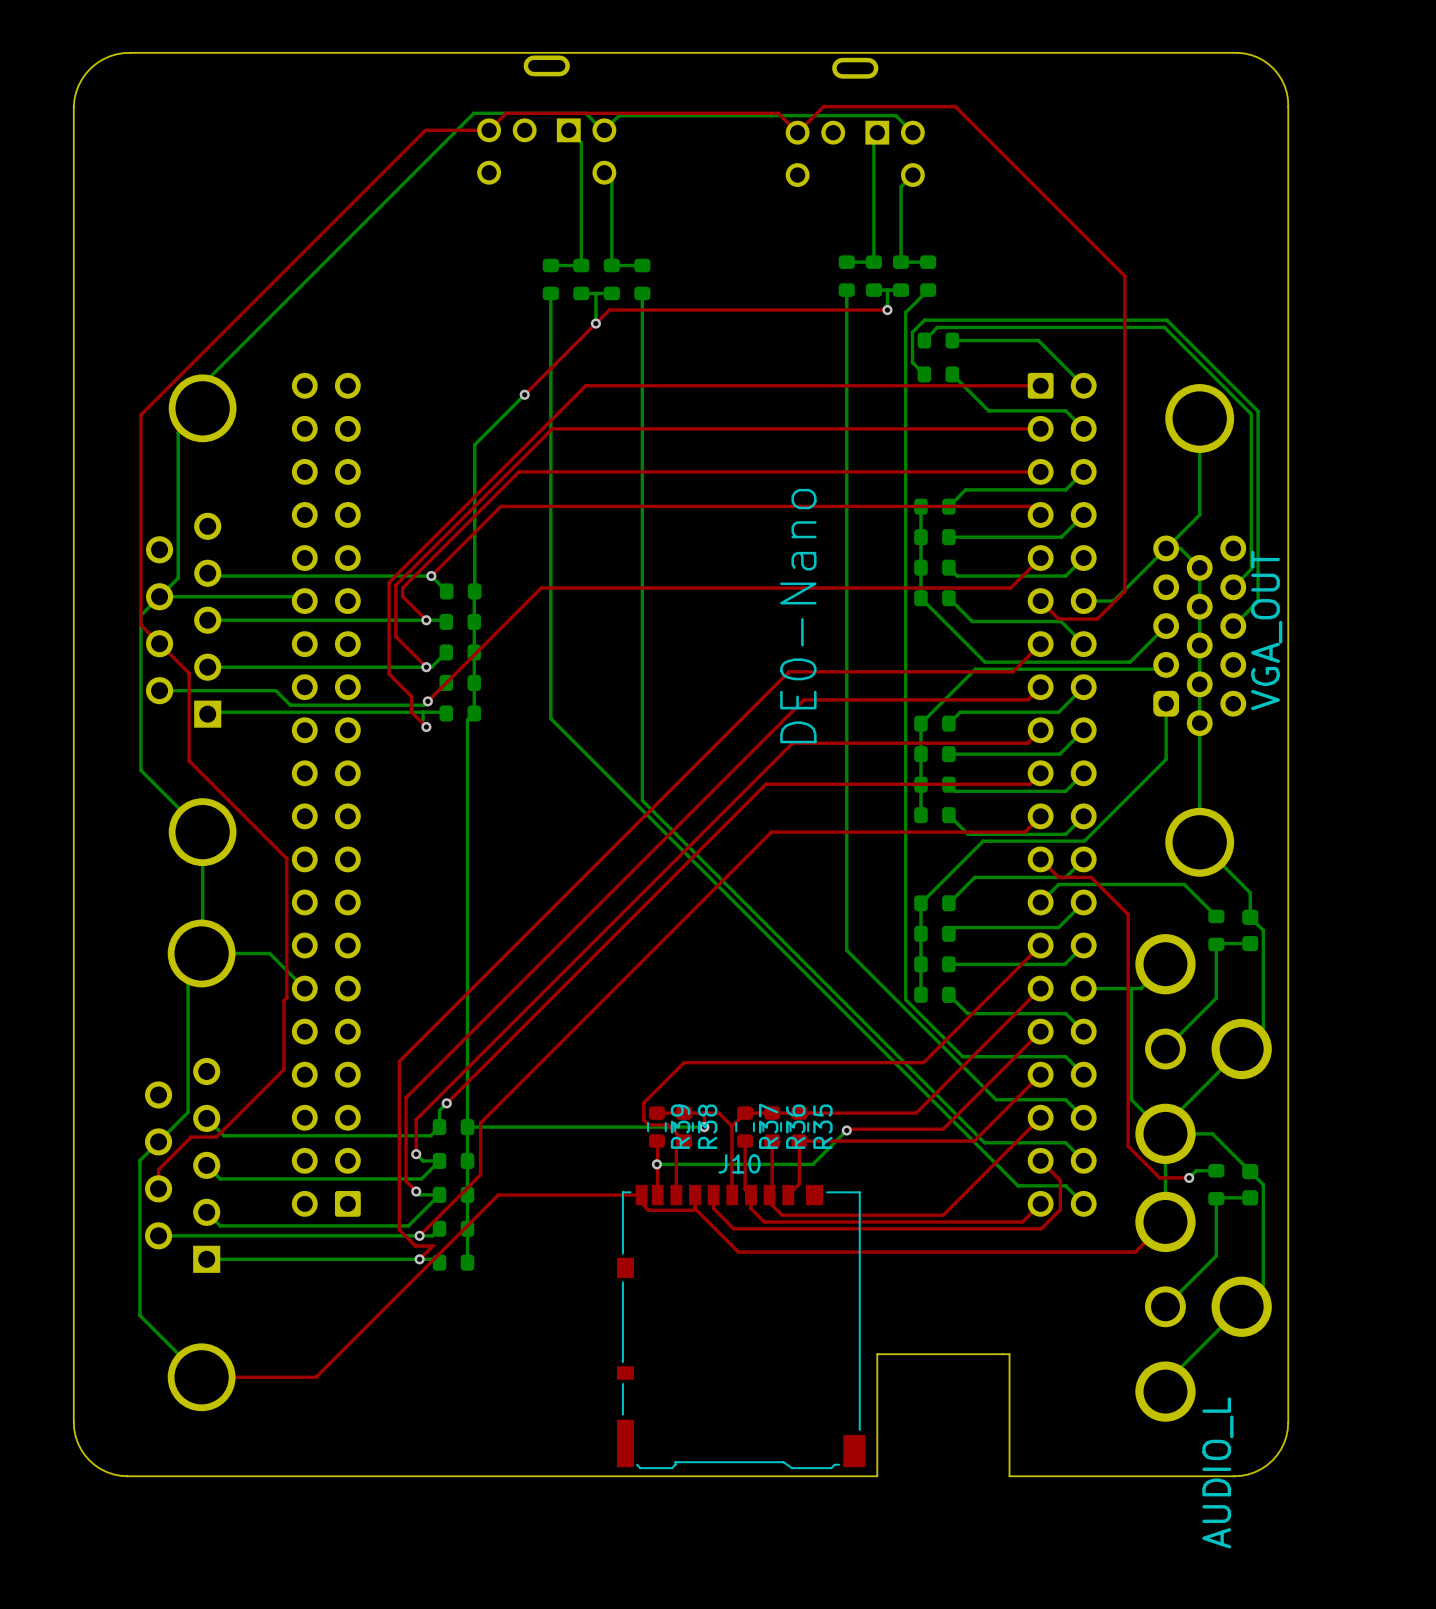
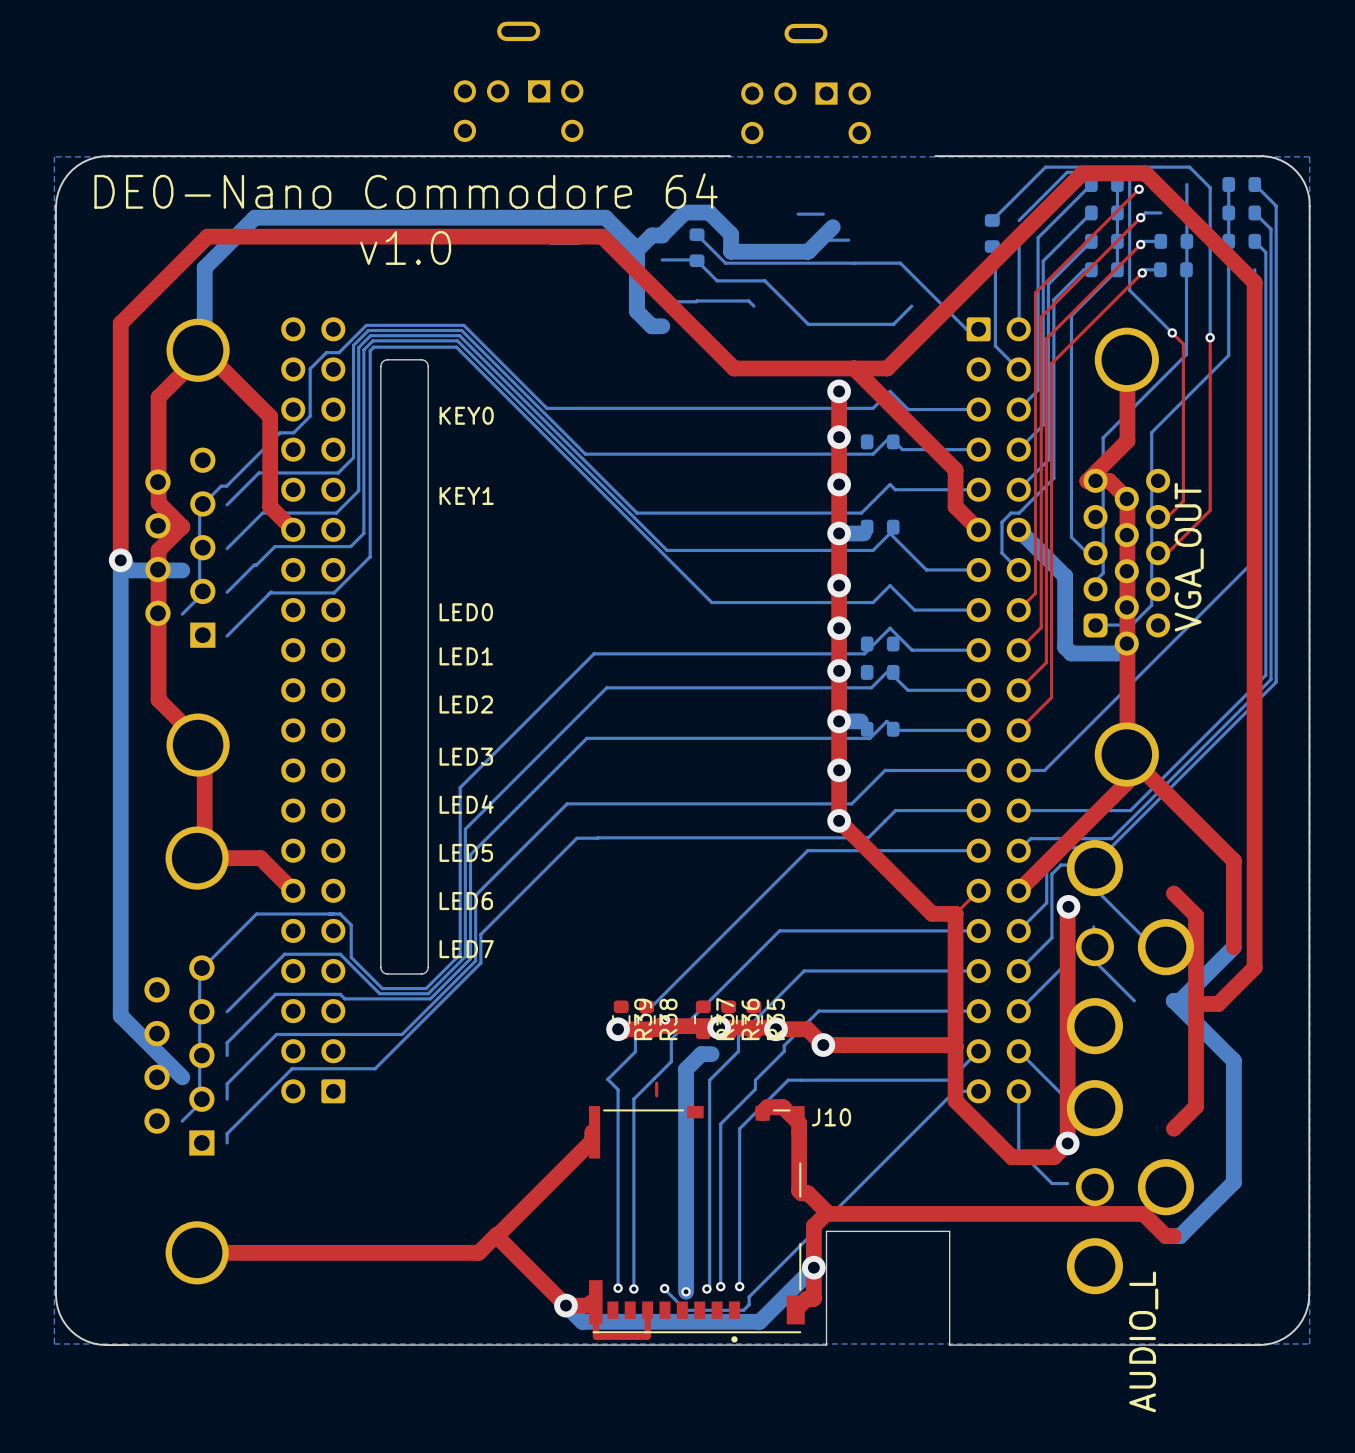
bottom track: (568, 130) (581, 142) (581, 265) (550, 265) -> none
bottom track: (877, 132) (873, 136) (873, 262) (877, 258) -> none
bottom track: (912, 132) (895, 115) (619, 115) (602, 130) (585, 113) (473, 113) (202, 384) (202, 408) (178, 432) (178, 578) (140, 615) (140, 770) (202, 832) (202, 952) (188, 967) (188, 1112) (139, 1160) (139, 1315) (201, 1377) -> none
bottom track: (604, 172) (611, 180) (611, 265) (642, 265) -> none
bottom track: (912, 175) (901, 186) (901, 262) (928, 262) -> none
board edge: none -> (935, 156) (1269, 156) (1286, 163) (1296, 171) (1303, 181) (1308, 193) (1308, 1301) (1305, 1314) (1294, 1330) (1284, 1338) (1272, 1343) (1259, 1345) (1159, 1345)
bottom zone outline: none -> (54, 156) (54, 1343) (1309, 1343) (1309, 156) (54, 156)
part: none -> (1104, 184)
bottom track: none -> (1117, 184) (1117, 269) (1071, 315) (1071, 537) (1087, 553)
bottom track: none -> (1186, 184) (1186, 354) (1103, 437) (1103, 573) (1087, 589)
bottom track: none -> (1228, 184) (1228, 355) (1151, 432) (1151, 605) (1131, 625) (1087, 625)
part: none -> (1241, 184)
top track: none -> (1139, 189) (1035, 292) (1035, 593) (1018, 610)
via: none -> (1139, 189)
text: none -> DE0-Nano Commodore 64 (406, 191)
part: none -> (1104, 212)
bottom track: none -> (1160, 212) (1145, 212) (1140, 217)
part: none -> (1241, 212)
top track: none -> (1140, 217) (1041, 317) (1041, 627) (1018, 650)
via: none -> (1140, 217)
bottom track: none -> (992, 220) (1045, 167) (1189, 167) (1210, 187) (1210, 337)
bottom track: none -> (1019, 220) (1067, 172) (1123, 172) (1129, 178) (1129, 290) (1172, 332)
part: (846, 276) -> none
part: (873, 276) -> none
bottom track: none -> (832, 227) (808, 251) (731, 251) (731, 234) (709, 212) (684, 212) (662, 235) (651, 235) (637, 250)
part: (901, 276) -> none
part: (928, 276) -> none
part: (550, 279) -> none
part: (581, 279) -> none
part: (611, 279) -> none
part: (642, 279) -> none
part: none -> (992, 233)
bottom track: none -> (697, 234) (725, 263) (900, 263) (966, 329) (978, 329)
bottom track: (846, 290) (846, 950) (996, 1099) (1065, 1099) (1083, 1117) -> (1067, 950) (1067, 962) (1018, 1011)
bottom track: (887, 290) (887, 310) -> none
bottom track: (928, 290) (905, 312) (905, 999) (962, 1056) (1065, 1056) (1083, 1074) -> (1067, 865) (1060, 865) (1051, 874) (1051, 937) (1018, 971)
part: none -> (1104, 241)
bottom track: none -> (1160, 241) (1143, 241) (1140, 244)
part: none -> (1173, 241)
part: none -> (1241, 241)
bottom track: (550, 293) (550, 718) (1018, 1185) (1065, 1185) (1083, 1203) -> (1067, 1183) (1052, 1183) (1018, 1150) (1018, 1091)
bottom track: (595, 293) (595, 323) -> none
bottom track: (642, 293) (642, 800) (984, 1142) (1065, 1142) (1083, 1160) -> (1067, 1103) (1067, 1100) (1018, 1051)
top track: none -> (1140, 244) (1046, 338) (1046, 662) (1018, 690)
via: none -> (1140, 244)
text: none -> v1.0 (405, 247)
part: none -> (697, 247)
top track: (887, 310) (609, 310) (524, 394) -> none
via: (887, 310) -> none
bottom track: none -> (662, 259) (696, 259) (717, 280) (764, 280) (808, 324) (893, 324) (911, 306)
part: none -> (1104, 269)
bottom track: none -> (1160, 269) (1145, 269) (1142, 272)
part: none -> (1173, 269)
via: (595, 323) -> none
top track: none -> (1142, 272) (1051, 363) (1051, 697) (1018, 730)
via: none -> (1142, 272)
bottom track: (924, 340) (937, 327) (1164, 327) (1251, 414) (1251, 569) (1233, 587) -> none
part: (938, 340) -> none
bottom track: (952, 340) (1038, 340) (1083, 385) -> (1019, 246) (1018, 329)
bottom track: none -> (662, 301) (748, 300) (753, 306)
bottom track: (924, 374) (912, 362) (912, 332) (924, 320) (1166, 320) (1258, 411) (1258, 601) (1233, 626) -> none
part: (938, 374) -> none
bottom track: (952, 374) (988, 410) (1065, 410) -> (992, 246) (995, 249) (995, 346) (1001, 352)
bottom track: none -> (662, 326) (651, 326) (637, 311) (637, 249) (605, 217) (254, 217) (204, 267) (204, 351)
top track: (1040, 385) (585, 385) (389, 582) (389, 674) (411, 696) (411, 712) (426, 727) -> none
top track: none -> (1172, 332) (1183, 344) (1183, 501) (1167, 517)
via: none -> (1172, 332)
bottom track: (524, 394) (474, 444) (474, 713) (467, 720) (467, 1262) -> none
via: (524, 394) -> none
top track: none -> (1210, 337) (1210, 510) (1167, 553)
via: none -> (1210, 337)
board edge: none -> (387, 359) (422, 359) (426, 361) (428, 366) (428, 967) (426, 972) (421, 974) (386, 973) (382, 971) (380, 967) (380, 366) (382, 361) (387, 359)
bottom track: (1199, 418) (1199, 514) (1113, 601) (1083, 601) -> (1127, 643) (1117, 653) (1071, 653) (1065, 647) (1065, 576) (1018, 529)
top track: none -> (1127, 359) (1127, 440) (1087, 481) (1109, 481) (1127, 499) (1127, 782) (1018, 890)
top track: (1040, 428) (552, 428) (395, 585) (395, 636) (426, 667) -> none
top track: none -> (839, 391) (839, 820) (932, 913) (955, 913) (955, 1100) (1011, 1157) (1053, 1157) (1067, 1143) (1068, 906)
via: none -> (839, 391)
top track: (1040, 471) (518, 471) (402, 588) (402, 596) (426, 620) -> none
bottom track: none -> (978, 409) (908, 409) (890, 391) (873, 408) (546, 408) (463, 325) (366, 325) (339, 352) (326, 352) (310, 368) (310, 416) (293, 432) (279, 432) (226, 486) (221, 486) (199, 507) (199, 596) (182, 614)
bottom track: (1083, 471) (1065, 489) (965, 489) (948, 506) -> (1018, 409) (1038, 390) (1038, 237) (1091, 184)
text: none -> KEY0 (466, 415)
via: none -> (839, 437)
bottom track: (920, 506) (920, 598) (984, 662) (1130, 662) (1166, 626) -> none
top track: (1040, 514) (1032, 506) (500, 506) (431, 576) -> none
bottom track: none -> (978, 449) (902, 449) (890, 437) (873, 454) (585, 454) (461, 330) (368, 330) (353, 345) (353, 457) (338, 472) (258, 472) (227, 504)
bottom track: (1083, 514) (1061, 537) (948, 537) -> (1018, 449) (1043, 425) (1043, 261) (1091, 212)
part: (934, 537) -> none
bottom track: (1166, 548) (1180, 548) (1199, 567) (1199, 842) (1250, 892) (1250, 917) (1263, 930) (1263, 1027) (1165, 1125) (1165, 1221) -> none
via: none -> (839, 484)
top track: (1040, 558) (1010, 588) (541, 588) (427, 701) -> none
bottom track: none -> (978, 489) (895, 489) (890, 484) (861, 513) (637, 513) (459, 335) (370, 335) (358, 347) (358, 490) (336, 513) (262, 513) (227, 548)
bottom track: (1083, 558) (1065, 576) (957, 576) (948, 567) -> (1018, 489) (1048, 460) (1048, 284) (1091, 241)
text: none -> KEY1 (466, 495)
part: (934, 567) -> none
bottom track: (207, 573) (210, 576) (431, 576) (446, 591) -> none
via: (431, 576) -> none
part: (460, 591) -> none
bottom track: (159, 596) (300, 596) (304, 601) -> none
bottom track: (948, 598) (972, 621) (1061, 621) (1065, 626) -> (1091, 269) (1083, 269) (1053, 299) (1053, 478) (1019, 513) (1011, 513) (1001, 522) (1001, 553)
top track: none -> (293, 529) (270, 506) (270, 416) (204, 351) (158, 397) (158, 503) (182, 526) (158, 550) (158, 699) (204, 745) (204, 858) (260, 858) (293, 890)
top track: (1040, 601) (1058, 619) (1097, 619) (1124, 591) (1124, 276) (955, 106) (823, 106) (797, 132) (778, 113) (506, 113) (489, 130) (425, 130) (140, 414) (140, 625) (189, 673) (189, 760) (286, 858) (286, 997) (283, 1000) (283, 1069) (216, 1137) (191, 1137) (158, 1169) (158, 1188) -> (978, 529) (955, 506) (955, 469) (854, 368)
bottom track: none -> (839, 533) (864, 533)
via: none -> (839, 533)
text: DE0-Nano (798, 616) -> none
bottom track: (207, 620) (444, 620) (446, 621) -> none
via: (426, 620) -> none
part: (460, 621) -> none
top track: none -> (120, 560) (120, 323) (207, 236) (602, 236) (734, 368) (887, 368) (1082, 173) (1145, 173) (1254, 282) (1254, 967) (1218, 1004) (1196, 1004)
via: none -> (120, 560)
bottom track: none -> (182, 570) (130, 570) (120, 560) (120, 1015) (182, 1077)
top track: (1040, 644) (1012, 671) (788, 671) (399, 1061) (399, 1229) (415, 1245) (432, 1245) (419, 1259) -> none
bottom track: none -> (978, 569) (926, 569) (890, 533) (873, 550) (667, 550) (457, 340) (372, 340) (363, 349) (363, 533) (350, 546) (274, 546) (227, 592)
bottom track: (446, 652) (431, 667) (207, 667) -> none
part: (460, 652) -> none
via: none -> (839, 585)
bottom track: (1166, 664) (1161, 669) (975, 669) (920, 723) (920, 815) -> none
bottom track: none -> (271, 591) (227, 636)
via: (426, 667) -> none
bottom track: none -> (270, 592) (334, 592) (370, 556) (370, 350) (373, 347) (456, 347) (711, 602) (873, 602) (890, 585) (914, 610) (978, 610)
bottom track: (446, 682) (424, 705) (290, 705) (275, 690) (159, 690) -> none
part: (460, 682) -> none
top track: (1040, 687) (1027, 699) (803, 699) (406, 1097) (406, 1181) (416, 1191) -> none
bottom track: (1083, 687) (1058, 712) (960, 712) (948, 723) -> none
text: none -> LED0 (466, 612)
via: (427, 701) -> none
bottom track: (1166, 703) (1166, 759) (1084, 841) (983, 841) (920, 903) (920, 994) -> none
via: none -> (839, 628)
bottom track: (423, 712) (423, 723) (426, 727) -> none
bottom track: (446, 713) (209, 712) (207, 714) -> none
part: (460, 713) -> none
via: (426, 727) -> none
top track: (1040, 730) (1027, 743) (792, 743) (416, 1119) (416, 1154) -> none
bottom track: none -> (978, 650) (912, 650) (890, 628) (864, 653) (593, 653) (460, 787) (460, 954) (426, 988) (382, 988) (351, 957) (351, 925) (340, 914) (256, 914) (199, 970) (199, 1103) (182, 1121)
bottom track: (1083, 730) (1059, 754) (948, 754) -> none
text: none -> LED1 (466, 656)
via: none -> (839, 670)
top track: (1040, 773) (1029, 784) (765, 784) (446, 1103) -> none
bottom track: none -> (978, 690) (907, 690) (888, 670) (871, 687) (606, 687) (465, 829) (465, 956) (428, 993) (379, 993) (340, 954) (284, 954) (227, 1011)
bottom track: (1083, 773) (1065, 791) (955, 791) (948, 784) -> none
part: (934, 784) -> none
text: none -> LED2 (466, 704)
bottom track: none -> (839, 721) (860, 721)
via: none -> (839, 721)
bottom track: (948, 815) (968, 834) (1065, 834) (1083, 816) -> none
top track: (1040, 816) (1024, 832) (771, 832) (480, 1122) (480, 1174) (419, 1235) -> none
bottom track: none -> (978, 730) (895, 730) (886, 721) (869, 738) (586, 738) (470, 854) (470, 958) (430, 998) (344, 998) (340, 994) (275, 994) (227, 1042) (227, 1055)
top track: none -> (1127, 754) (1233, 860) (1233, 947)
text: none -> LED3 (466, 756)
via: none -> (839, 770)
bottom track: none -> (885, 770) (851, 803) (567, 803) (475, 895) (475, 960) (402, 1034) (276, 1034) (227, 1083) (227, 1099)
bottom track: none -> (885, 770) (978, 770)
top track: (1040, 859) (1058, 877) (1091, 877) (1128, 914) (1128, 1146) (1159, 1177) (1189, 1177) -> none
bottom track: (1083, 859) (1065, 877) (974, 877) (948, 903) -> (1018, 770) (1044, 770) (1254, 560) (1254, 269)
text: none -> LED4 (466, 804)
bottom track: (1040, 902) (1058, 884) (1184, 884) (1216, 916) -> (978, 810) (895, 810) (868, 837) (577, 838) (480, 934) (480, 963) (375, 1068) (292, 1068) (227, 1133) (227, 1142)
bottom track: (1083, 902) (1058, 927) (955, 927) (948, 933) -> (1018, 810) (1130, 810) (1265, 675) (1265, 252) (1254, 241)
part: (934, 903) -> none
via: none -> (839, 820)
part: (1216, 930) -> none
part: (1250, 930) -> none
part: (934, 933) -> none
bottom track: (1250, 943) (1216, 944) (1216, 998) (1165, 1049) -> none
top track: (1040, 945) (923, 1062) (684, 1062) (643, 1102) (643, 1120) (648, 1124) (667, 1124) (684, 1141) (676, 1148) (676, 1195) -> none
bottom track: none -> (978, 850) (807, 850) (635, 1022) (635, 1051) (607, 1079) (618, 1089) (618, 1288)
bottom track: (1083, 945) (1064, 964) (948, 964) -> (1018, 850) (1030, 838) (1111, 838) (1271, 679) (1271, 229) (1254, 212)
text: none -> LED5 (466, 852)
bottom track: (201, 953) (269, 953) (304, 988) -> none
bottom track: none -> (1093, 865) (1093, 888) (1173, 967)
part: (934, 964) -> none
bottom track: (1165, 964) (1141, 988) (1083, 988) -> none
bottom track: (1131, 988) (1131, 1099) (1165, 1133) (1212, 1133) (1263, 1184) (1263, 1285) (1165, 1382) (1165, 1391) -> none
top track: none -> (1173, 893) (1196, 915) (1196, 1106) (1173, 1128)
part: (934, 994) -> none
bottom track: (948, 994) (967, 1013) (1065, 1013) (1083, 1031) -> (1254, 184) (1276, 205) (1276, 682) (1110, 847) (1066, 847) (1046, 867) (1046, 902) (1018, 930)
text: none -> LED6 (466, 901)
via: none -> (1068, 906)
top track: (1015, 1013) (916, 1113) (745, 1113) (731, 1126) -> none
bottom track: none -> (1093, 926) (1093, 960) (1134, 1000)
top track: (1040, 1031) (943, 1129) (846, 1130) -> none
bottom track: none -> (978, 930) (779, 930) (671, 1039) (671, 1061) (633, 1099) (633, 1289)
bottom track: none -> (1233, 947) (1180, 1000) (1173, 1000) (1233, 1060) (1233, 1182) (1180, 1236) (1173, 1236)
text: none -> LED7 (466, 949)
top track: (1040, 1074) (974, 1141) (799, 1141) (799, 1183) (788, 1195) -> none
bottom track: none -> (978, 971) (804, 971) (738, 1036) (738, 1051) (709, 1080) (709, 1286) (706, 1289)
bottom track: (446, 1103) (439, 1110) (439, 1127) (430, 1135) (224, 1135) (206, 1118) -> none
via: (446, 1103) -> none
top track: (656, 1113) (718, 1113) (731, 1126) -> none
top track: (704, 1113) (704, 1127) -> none
top track: (1040, 1117) (943, 1215) (782, 1215) (769, 1202) (769, 1195) (772, 1192) (772, 1141) -> none
bottom track: none -> (978, 1011) (818, 1011) (784, 1045) (784, 1051) (755, 1080) (755, 1089) (720, 1124) (720, 1286)
top track: (731, 1126) (732, 1195) -> none
part: (453, 1127) -> none
bottom track: (467, 1127) (704, 1127) -> none
bottom track: (846, 1130) (812, 1164) (656, 1164) -> none
via: (846, 1130) -> none
via: none -> (719, 1027)
top track: none -> (618, 1029) (655, 1029) (659, 1026) (807, 1029) (823, 1045) (953, 1045) (955, 1046)
via: none -> (618, 1029)
via: none -> (775, 1029)
top track: (656, 1141) (657, 1195) -> none
top track: (745, 1141) (745, 1189) (750, 1195) (750, 1208) (764, 1222) (1022, 1222) (1040, 1203) -> none
bottom track: (416, 1154) (423, 1160) (439, 1160) (421, 1178) (220, 1178) (206, 1165) -> none
via: (416, 1154) -> none
via: none -> (823, 1045)
part: (453, 1160) -> none
top track: (1040, 1160) (1060, 1180) (1060, 1209) (1041, 1228) (733, 1228) (713, 1208) (713, 1195) -> none
bottom track: none -> (978, 1051) (949, 1080) (788, 1080) (739, 1128) (739, 1286)
J10 name position: J10 (739, 1163) -> J10 (831, 1117)
bottom track: none -> (711, 1054) (701, 1054) (686, 1069) (686, 1291)
via: (656, 1164) -> none
bottom track: (1216, 1170) (1196, 1170) (1189, 1177) -> none
via: (1189, 1177) -> none
J10 footprint: [617, 1184, 866, 1470] -> [589, 1106, 805, 1343]
part: (1216, 1184) -> none
part: (1250, 1184) -> none
bottom track: (416, 1191) (419, 1194) (439, 1194) (408, 1225) (220, 1225) (206, 1212) -> none
via: (416, 1191) -> none
part: (453, 1194) -> none
bottom track: (1250, 1197) (1216, 1198) (1216, 1255) (1165, 1306) -> none
bottom track: none -> (978, 1091) (954, 1091) (749, 1296) (749, 1304) (743, 1310) (685, 1310) (664, 1288)
top track: (1165, 1221) (1135, 1252) (738, 1252) (694, 1208) (693, 1210) (648, 1210) (641, 1203) (641, 1195) (498, 1195) (316, 1377) -> (496, 1236) (496, 1234) (478, 1252) (303, 1252)
top track: none -> (762, 1113) (767, 1107) (782, 1107) (799, 1123) (799, 1190) (801, 1193) (808, 1193) (826, 1211) (826, 1213)
bottom track: (439, 1228) (432, 1235) (158, 1235) -> none
part: (453, 1228) -> none
via: (419, 1235) -> none
top track: none -> (592, 1132) (592, 1140) (496, 1236)
bottom track: (206, 1259) (436, 1259) (439, 1262) -> none
via: (419, 1259) -> none
via: none -> (1067, 1143)
part: (453, 1262) -> none
top track: none -> (826, 1213) (813, 1226) (813, 1298) (806, 1298) (795, 1309)
top track: none -> (826, 1213) (1143, 1213) (1165, 1236) (1173, 1236)
top track: none -> (496, 1236) (565, 1305) (591, 1305) (591, 1302)
top track width: thin (209, 1377) (316, 1377) -> thick (204, 1252) (303, 1252)
bottom track: none -> (813, 1267) (759, 1321) (582, 1321) (565, 1305)
via: none -> (813, 1267)
via: none -> (720, 1286)
via: none -> (739, 1286)
via: none -> (618, 1288)
via: none -> (664, 1288)
via: none -> (633, 1289)
via: none -> (706, 1289)
via: none -> (686, 1291)
top track: none -> (595, 1302) (596, 1336) (646, 1336) (647, 1317)
via: none -> (565, 1305)
board edge: (127, 1476) (107, 1472) (89, 1460) (77, 1443) (73, 1422) (73, 106) (76, 92) (86, 73) (96, 63) (109, 56) (131, 52) (1237, 52) (1257, 57) (1269, 64) (1282, 80) (1288, 99) (1288, 1422) (1284, 1443) (1272, 1460) (1255, 1472) (1234, 1476) -> (128, 1345) (99, 1344) (86, 1341) (75, 1334) (66, 1325) (59, 1314) (55, 1294) (55, 206) (60, 186) (67, 175) (77, 165) (89, 159) (102, 156) (730, 156)

